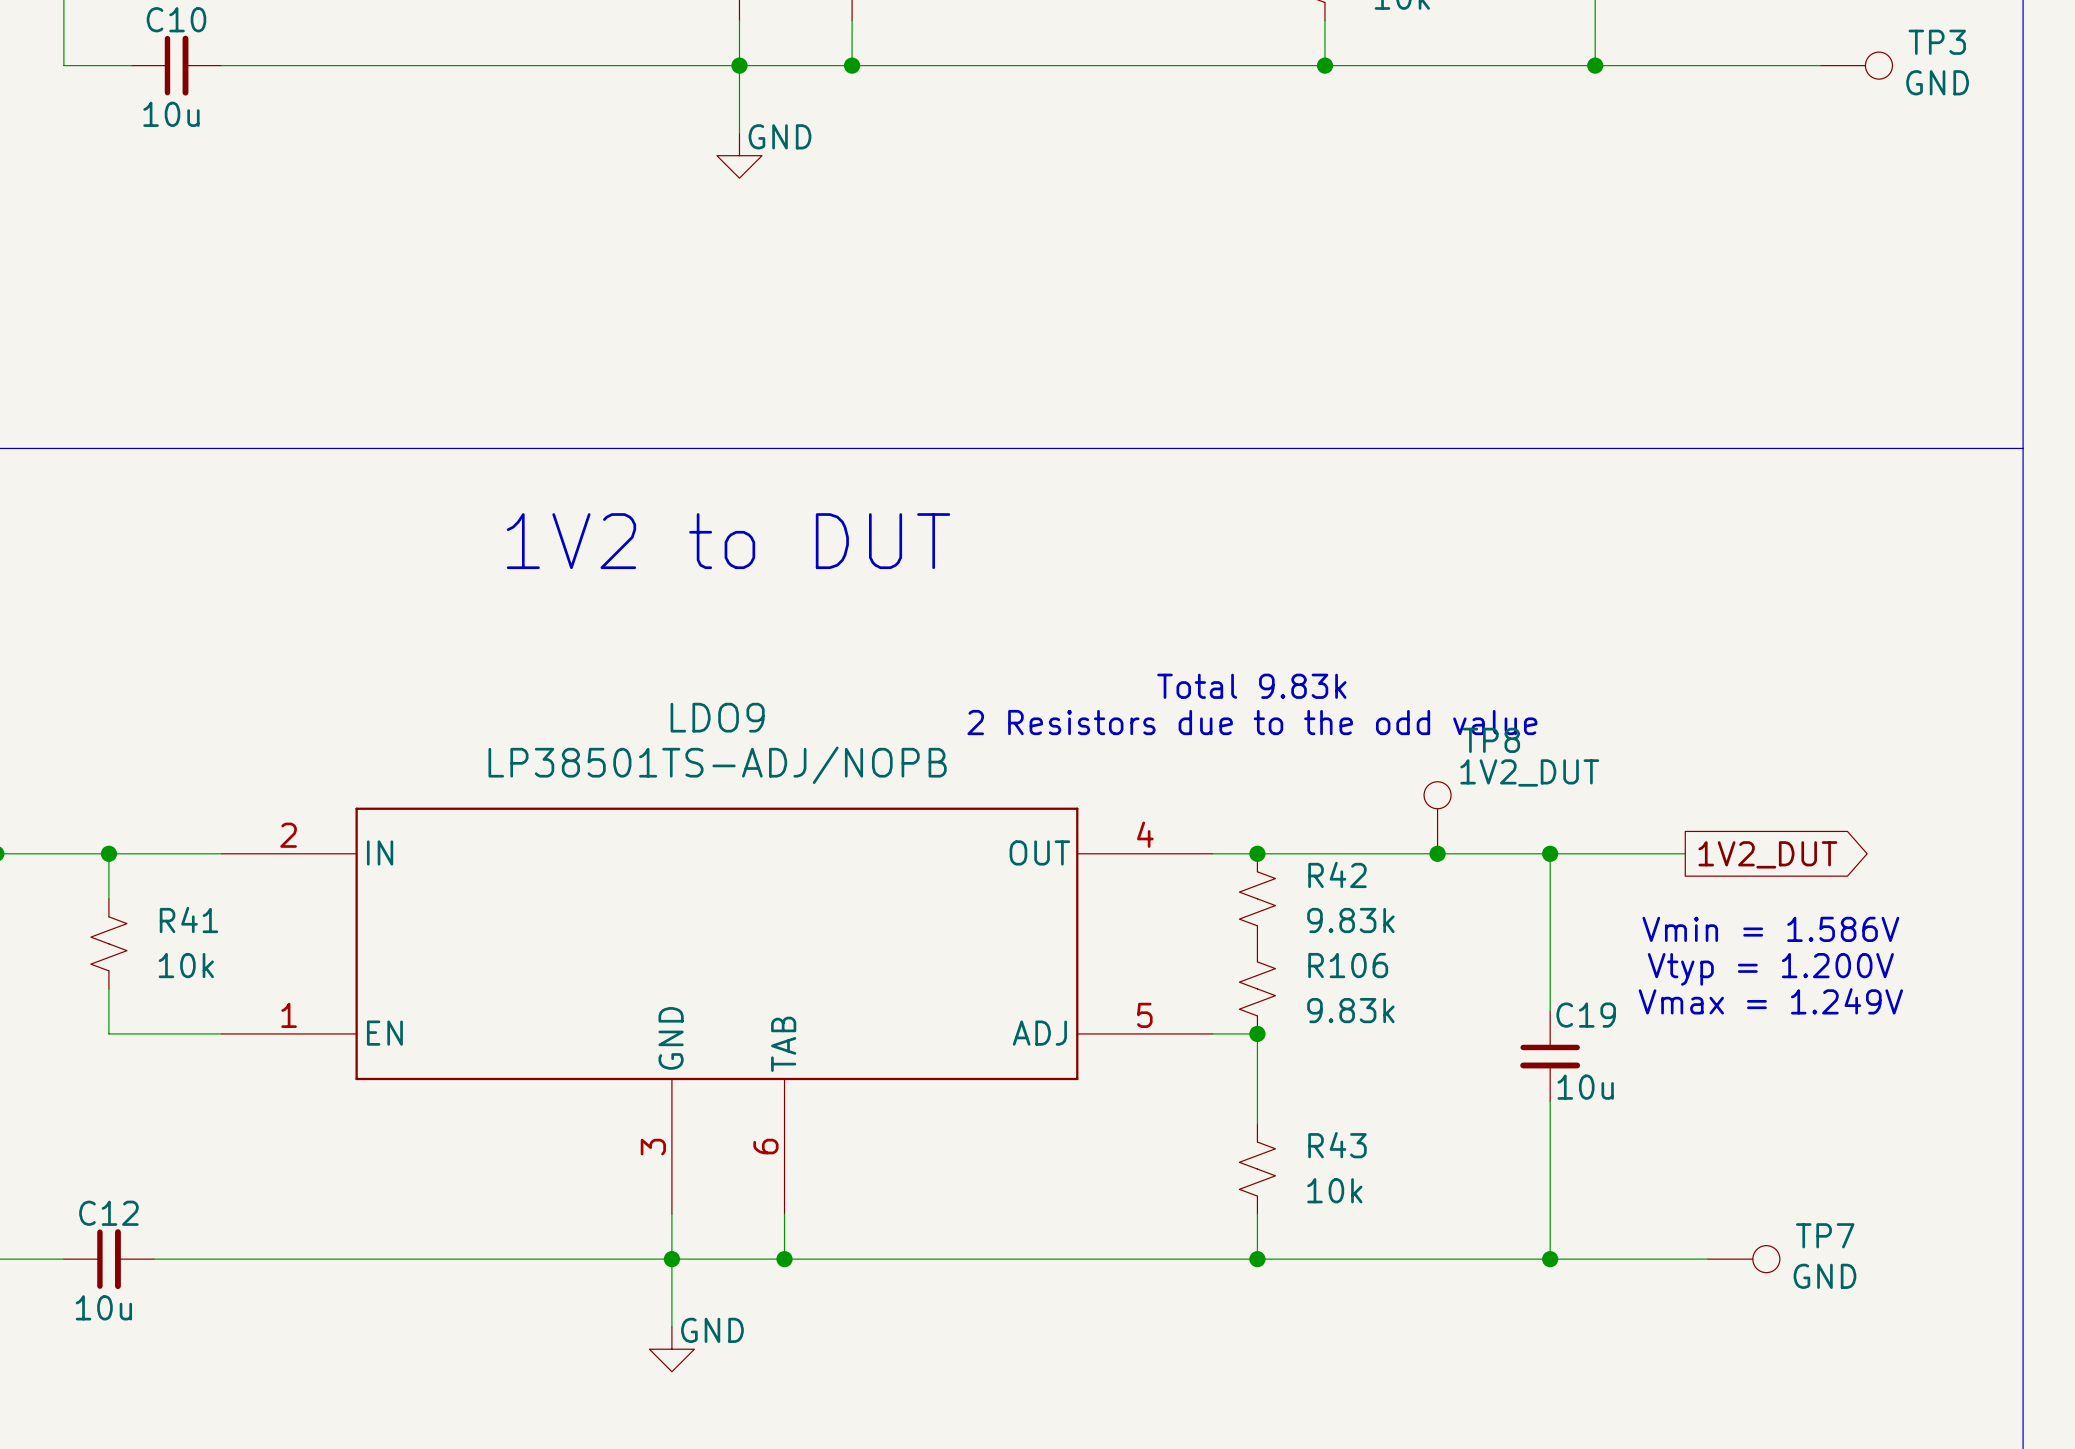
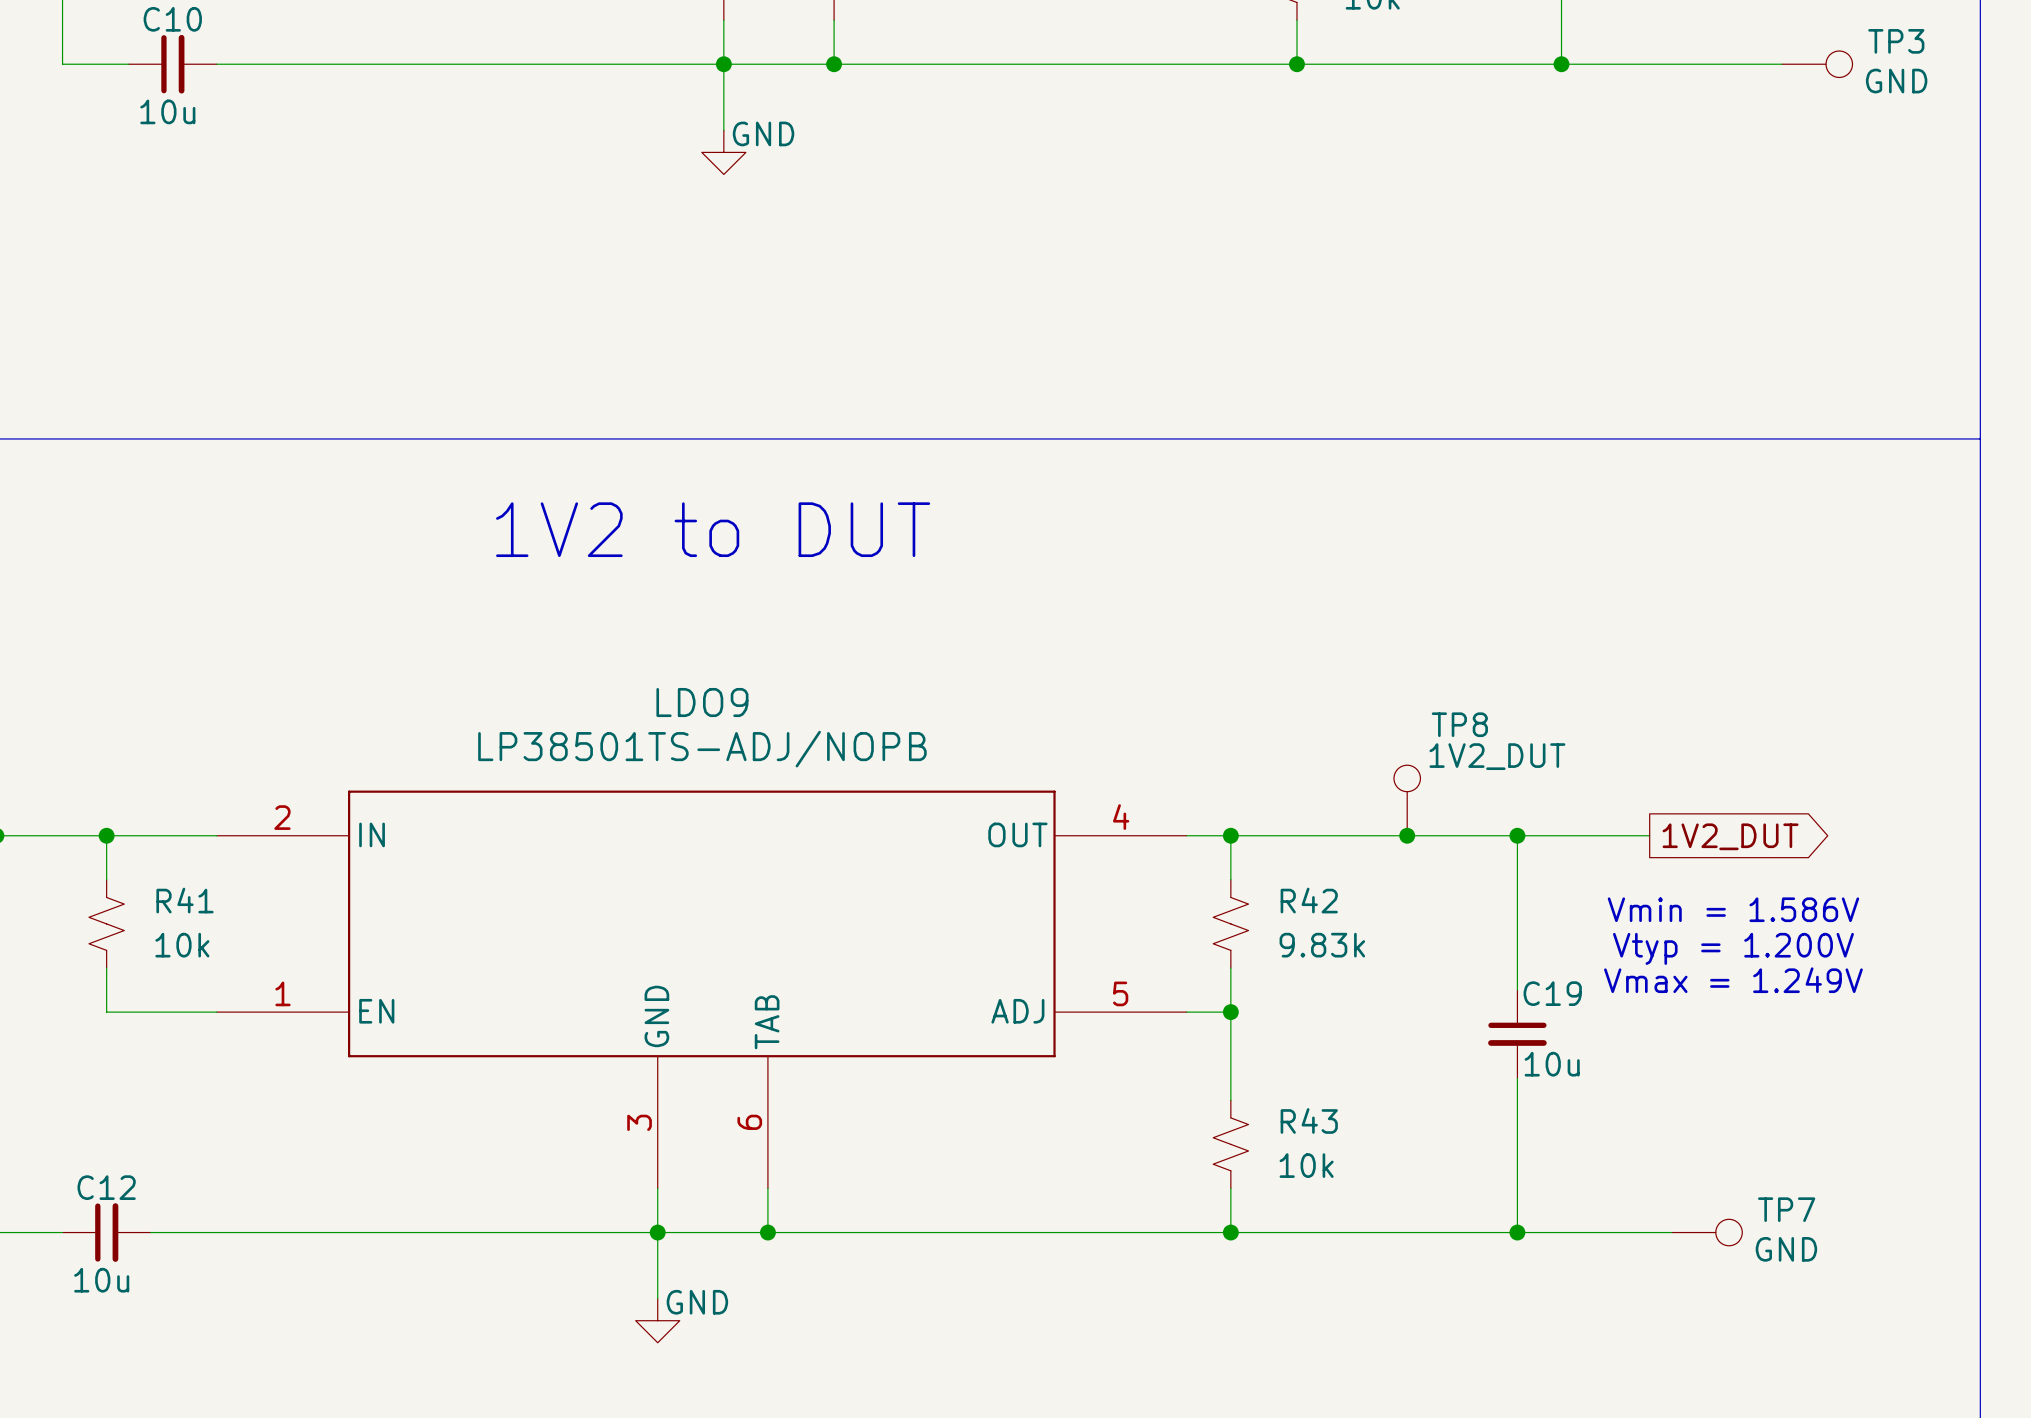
text: Total 9.83k (1251, 686) -> none
text: 2 Resistors due to the odd value (1252, 722) -> none
wire: none -> (1230, 835) (1230, 879)
R42 position: (1257, 898) -> (1230, 923)
wire: none -> (1230, 968) (1230, 1012)
R106: 9.83k (1257, 988) -> none

